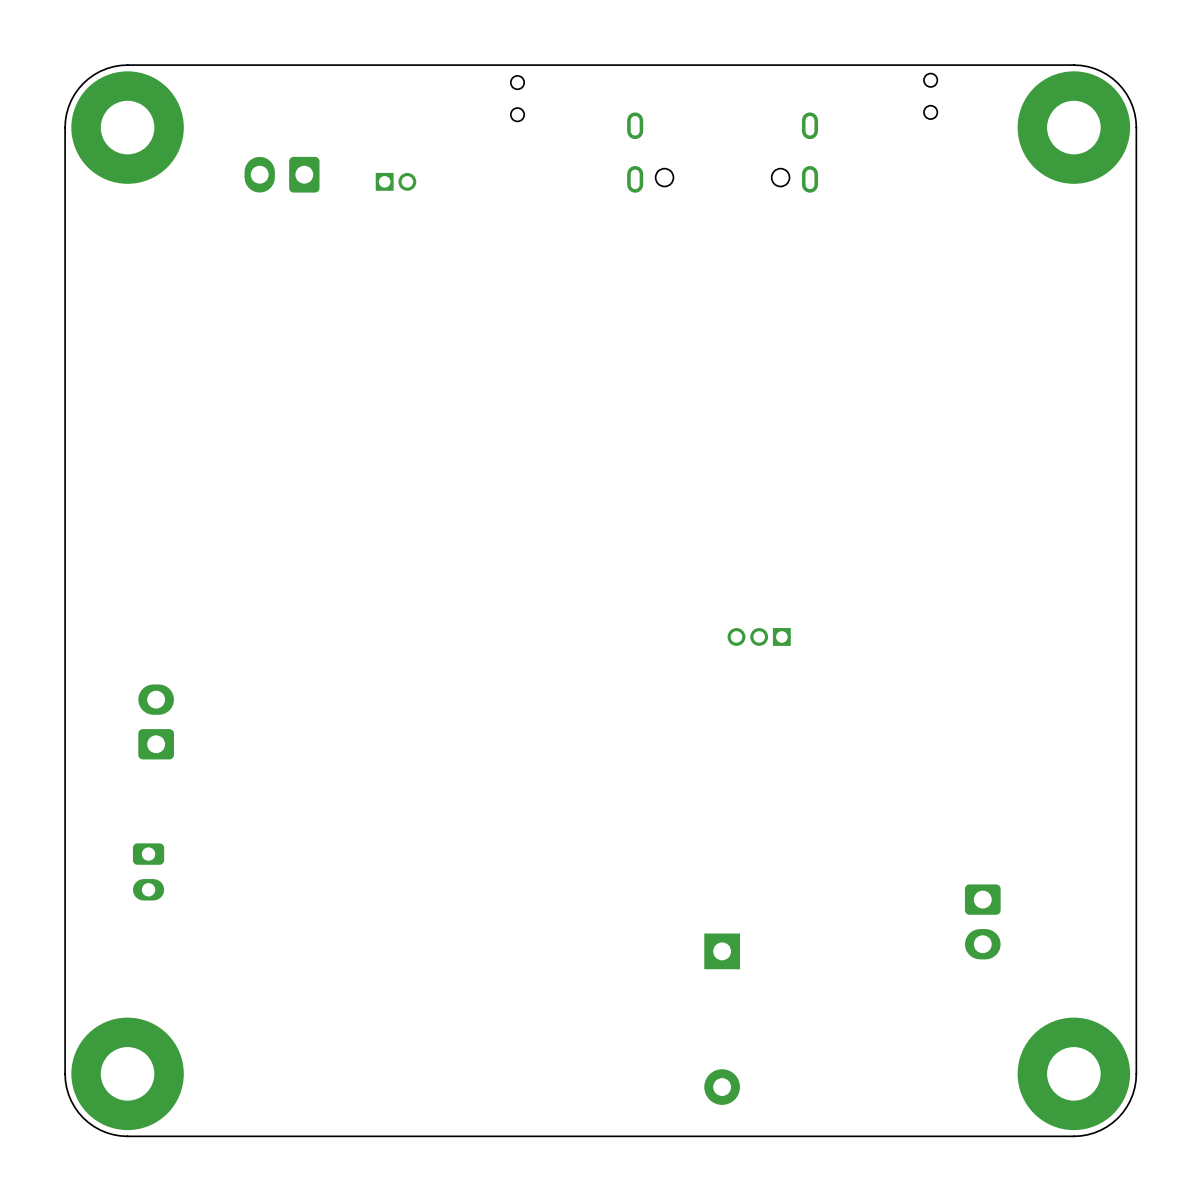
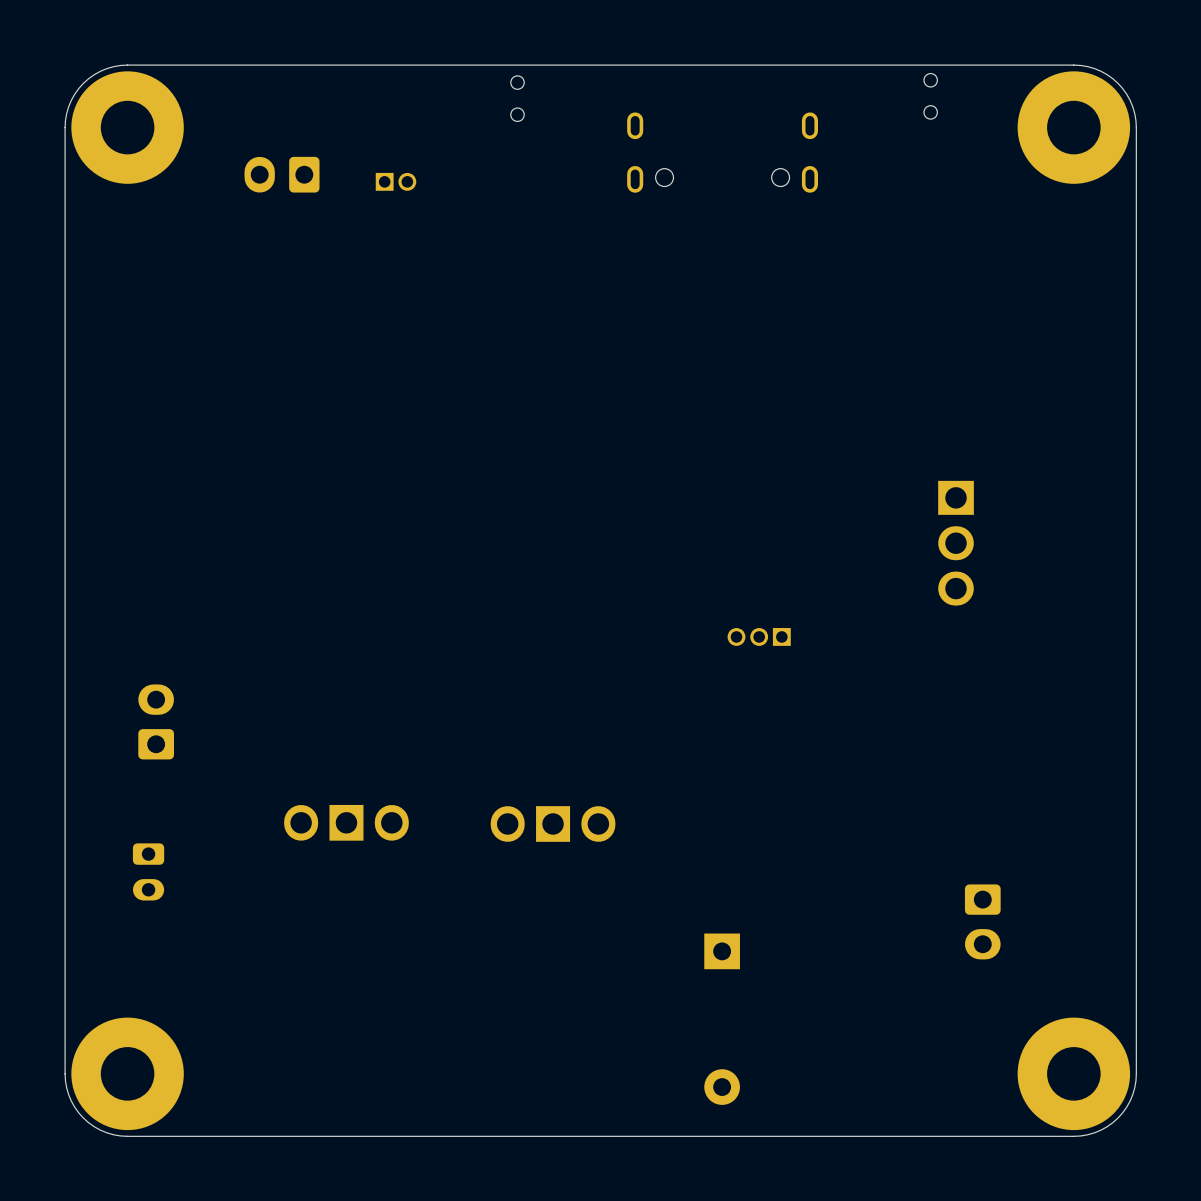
part: none -> (956, 543)
part: none -> (346, 822)
part: none -> (553, 823)

